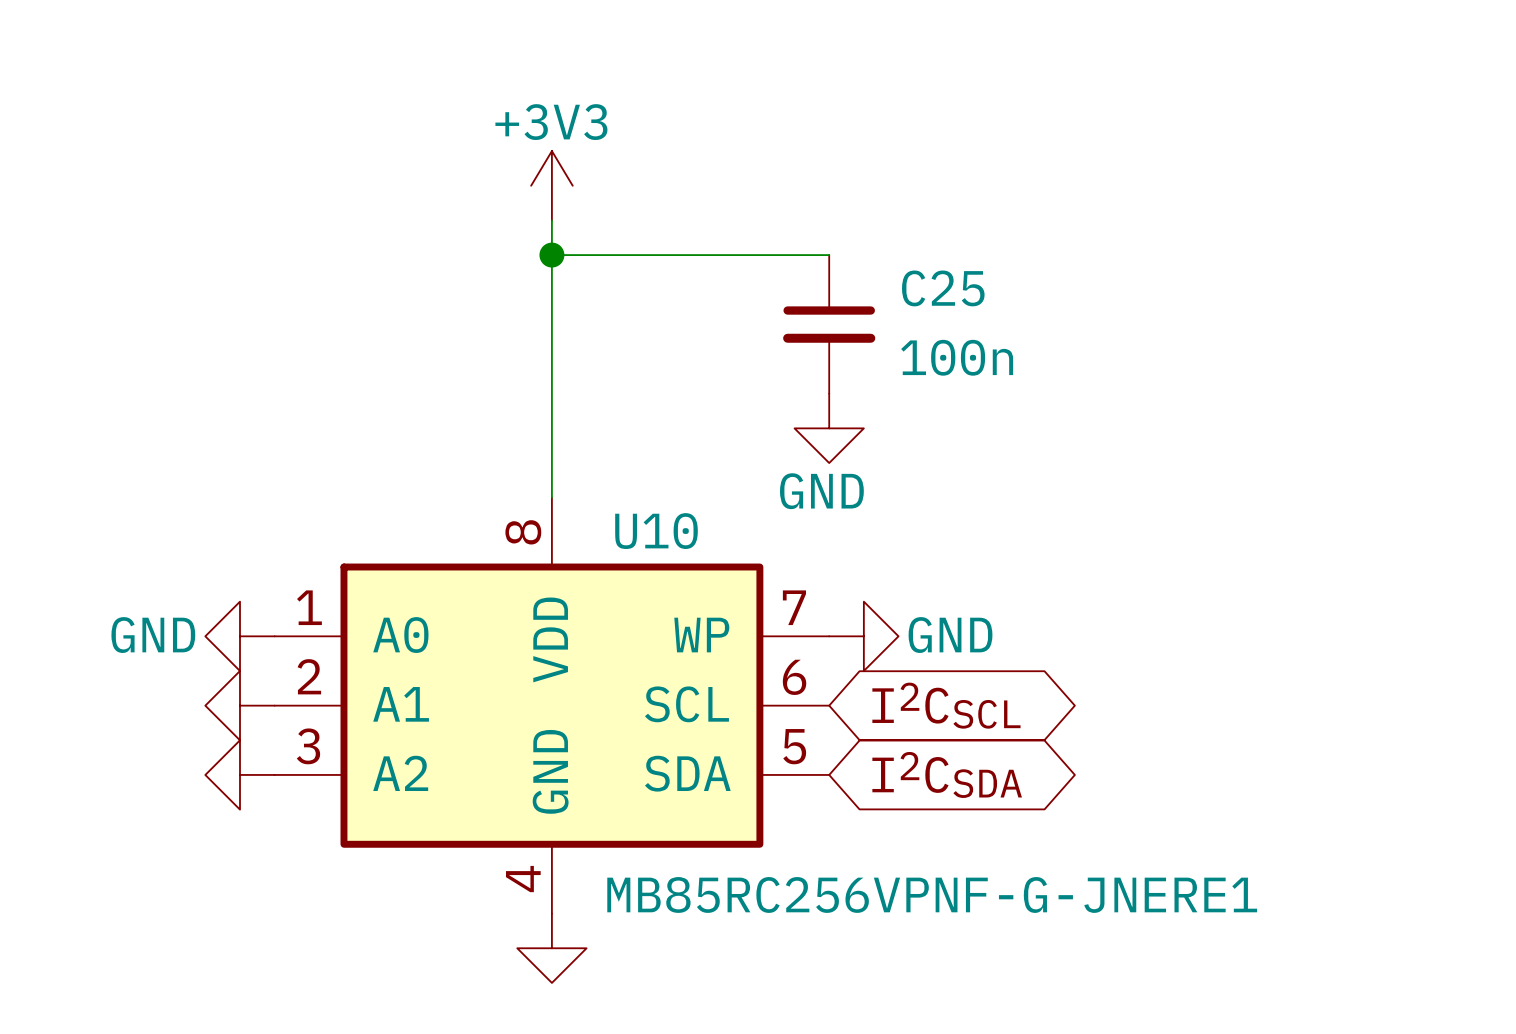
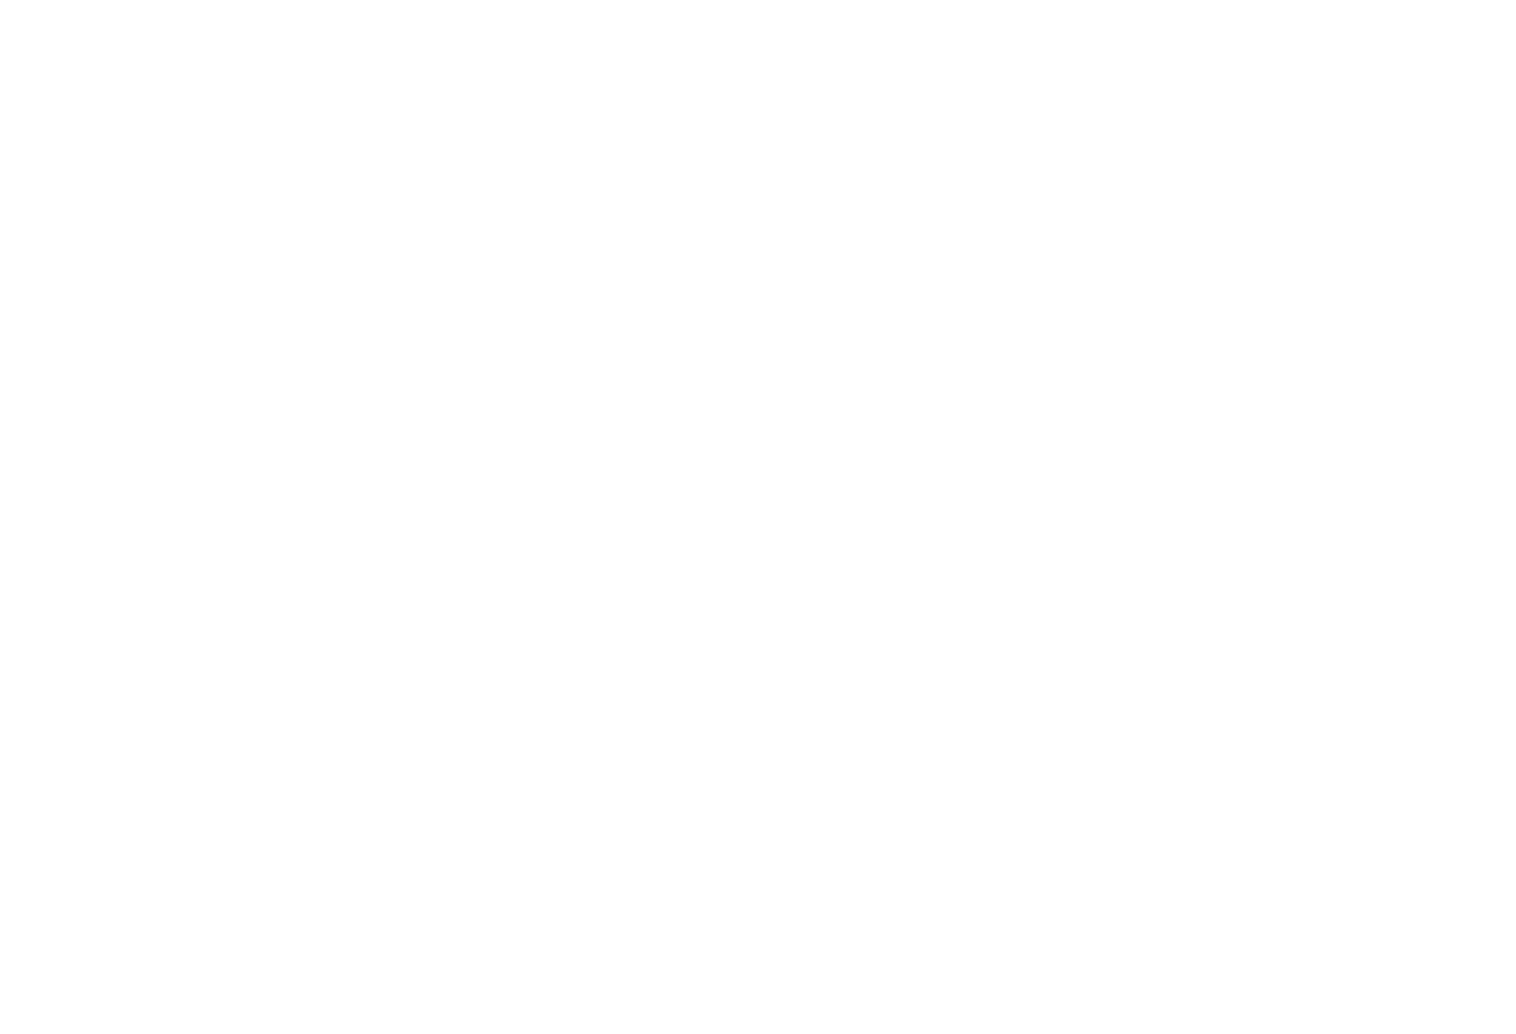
power symbol: +3V3 (551, 185) -> none
wire: (551, 220) (551, 497) -> none
wire: (551, 255) (829, 255) -> none
junction: (551, 255) -> none
C25: 100n (829, 324) -> none
power symbol: GND (829, 428) -> none
power symbol: GND (239, 636) -> none
power symbol: GND (863, 636) -> none
power symbol: (239, 705) -> none
U10: MB85RC256VPNF-G-JNERE1 (551, 705) -> none
global label: I2CSCL (946, 705) -> none
power symbol: (239, 774) -> none
global label: I2CSDA (947, 774) -> none
power symbol: (551, 948) -> none

